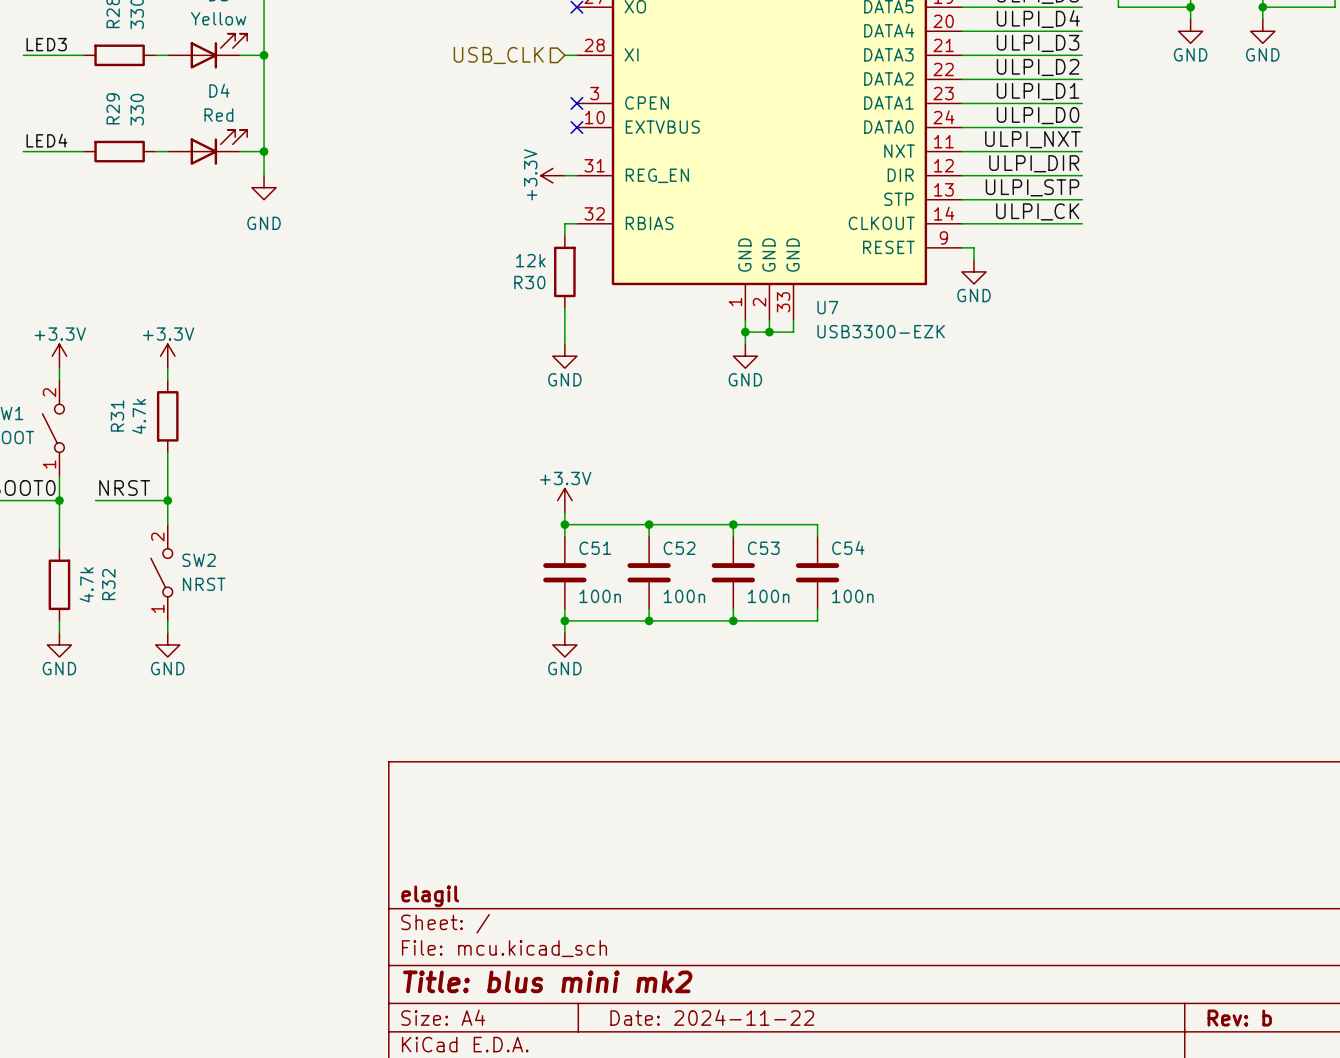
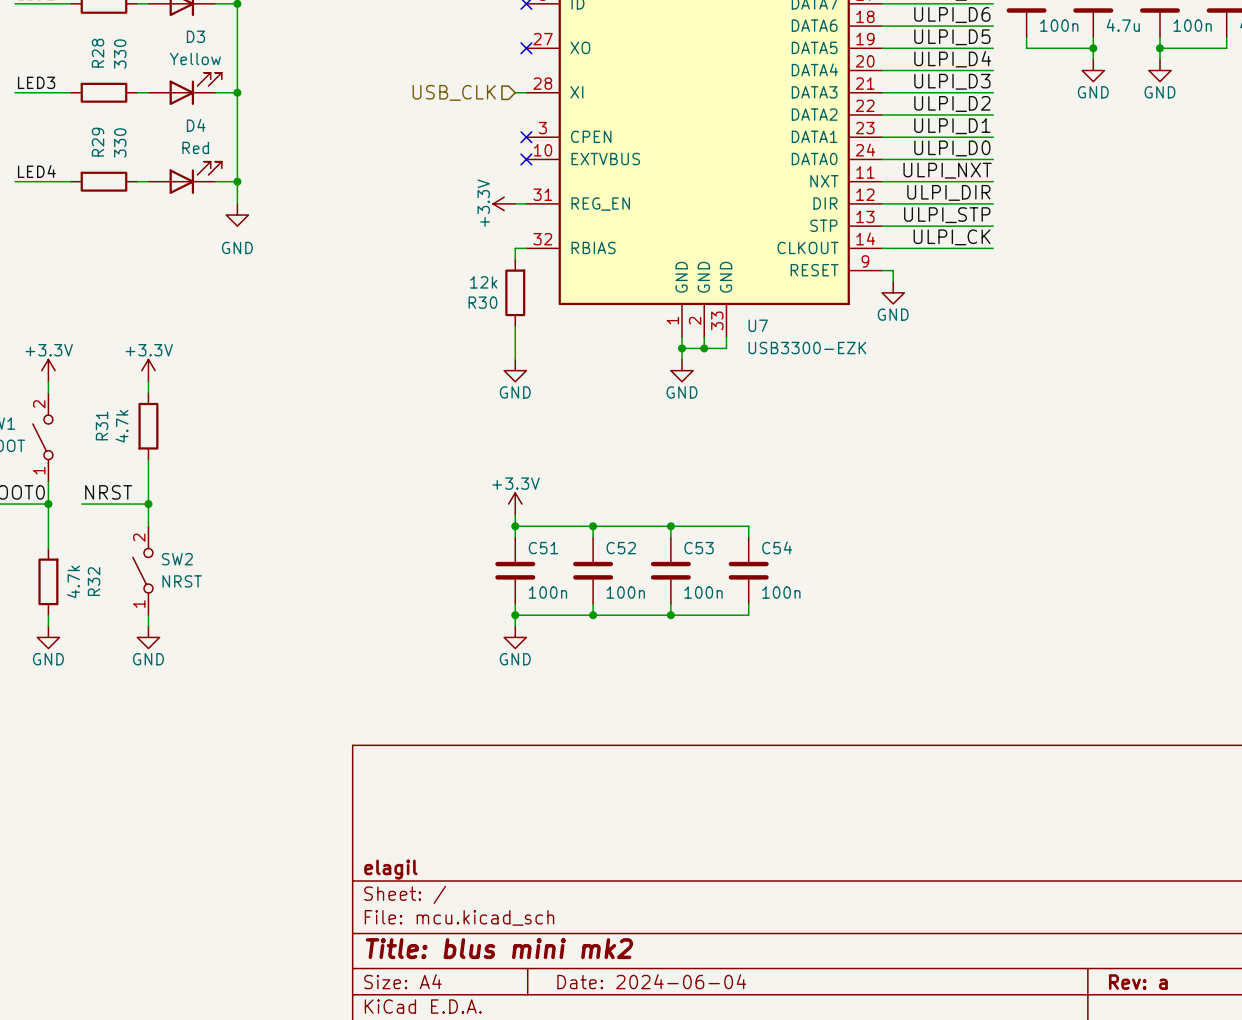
title block: Date: 2024-11-22 (712, 1017) -> Date: 2024-06-04 (651, 981)
title block: Rev: b (1239, 1018) -> Rev: a (1138, 982)

